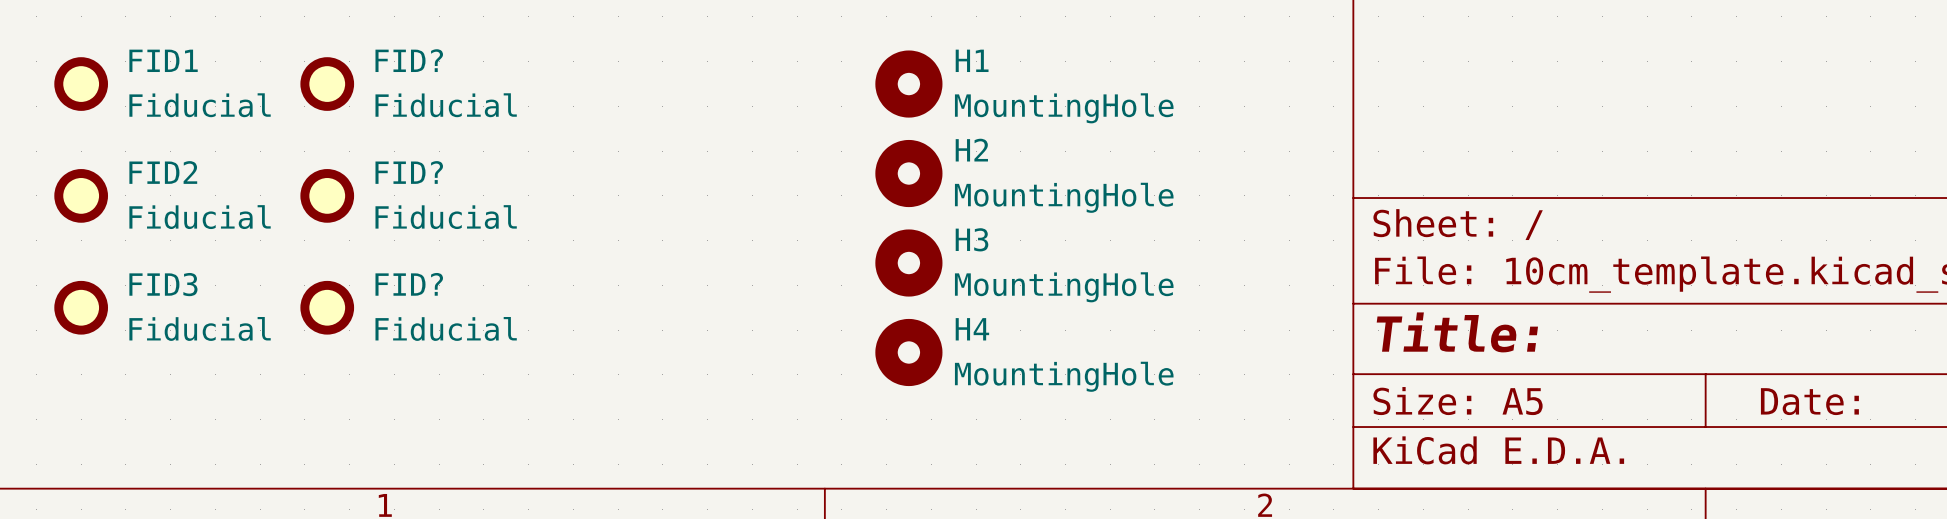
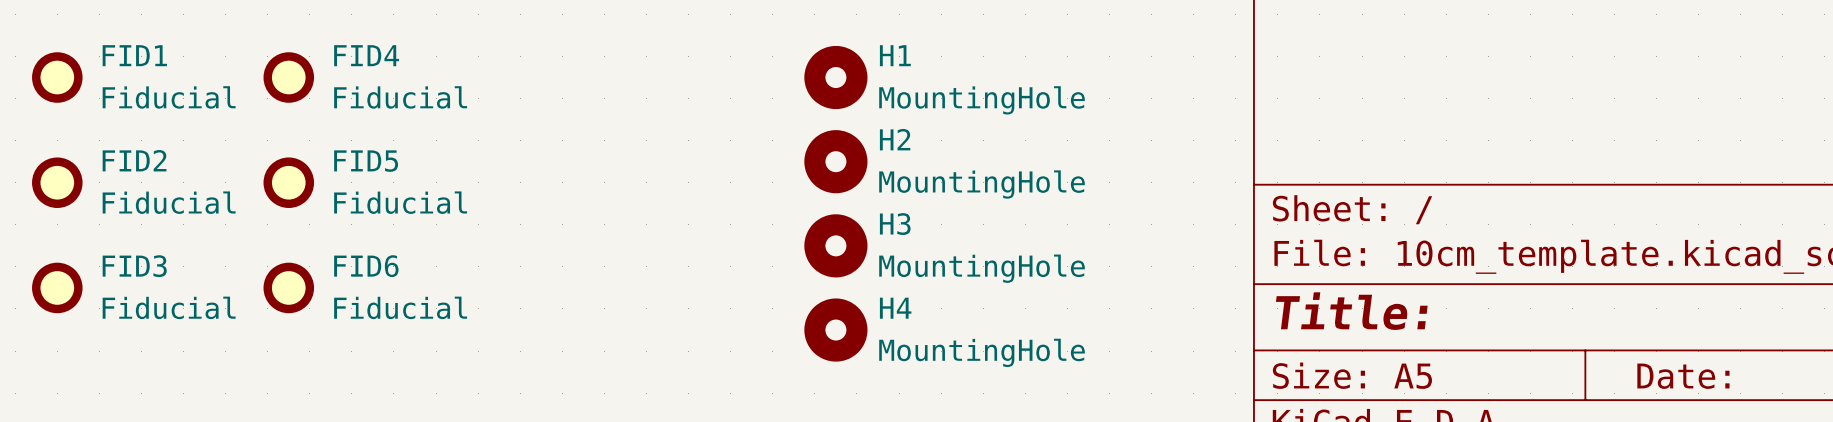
FID? name: FID? (409, 60) -> FID4 (366, 55)
FID? name: FID? (409, 172) -> FID5 (366, 161)
FID? name: FID? (409, 284) -> FID6 (366, 266)

